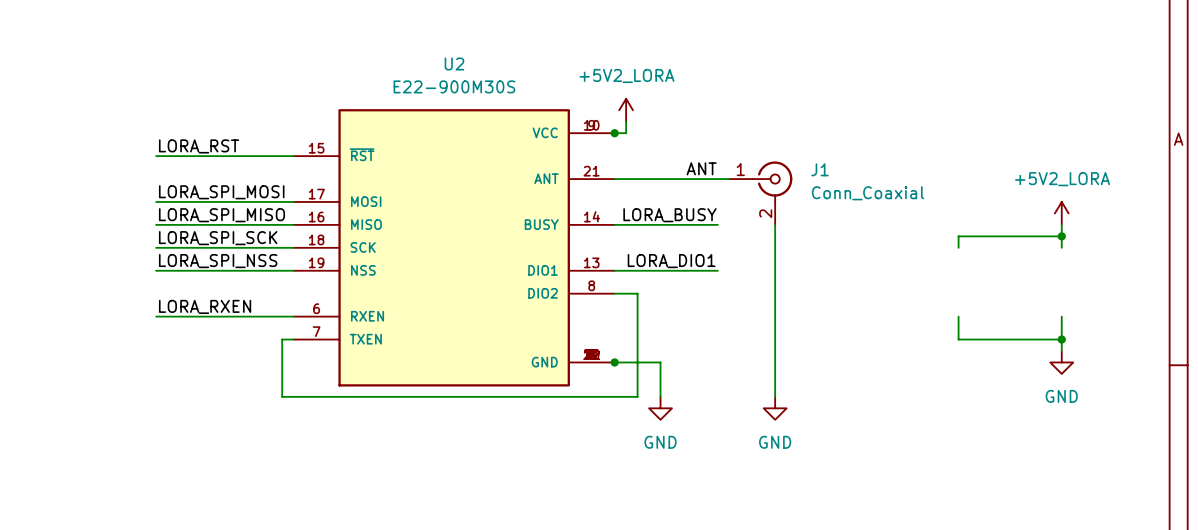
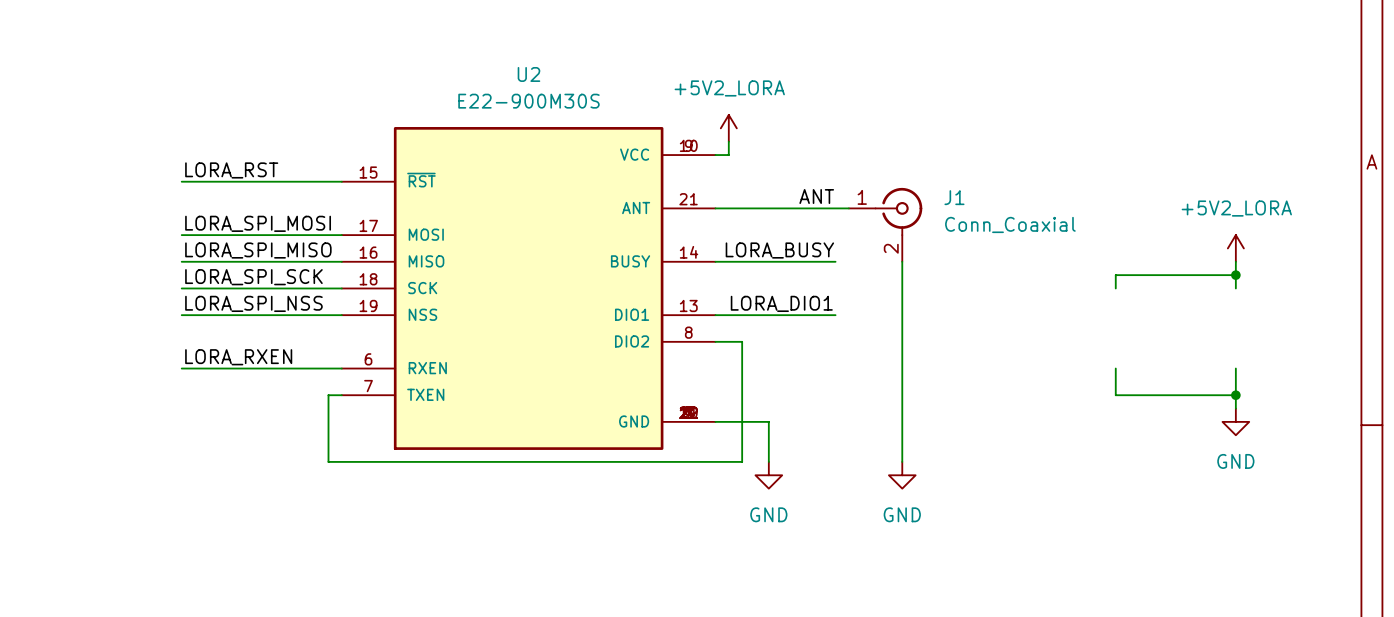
junction: (614, 133) -> none
junction: (614, 362) -> none

